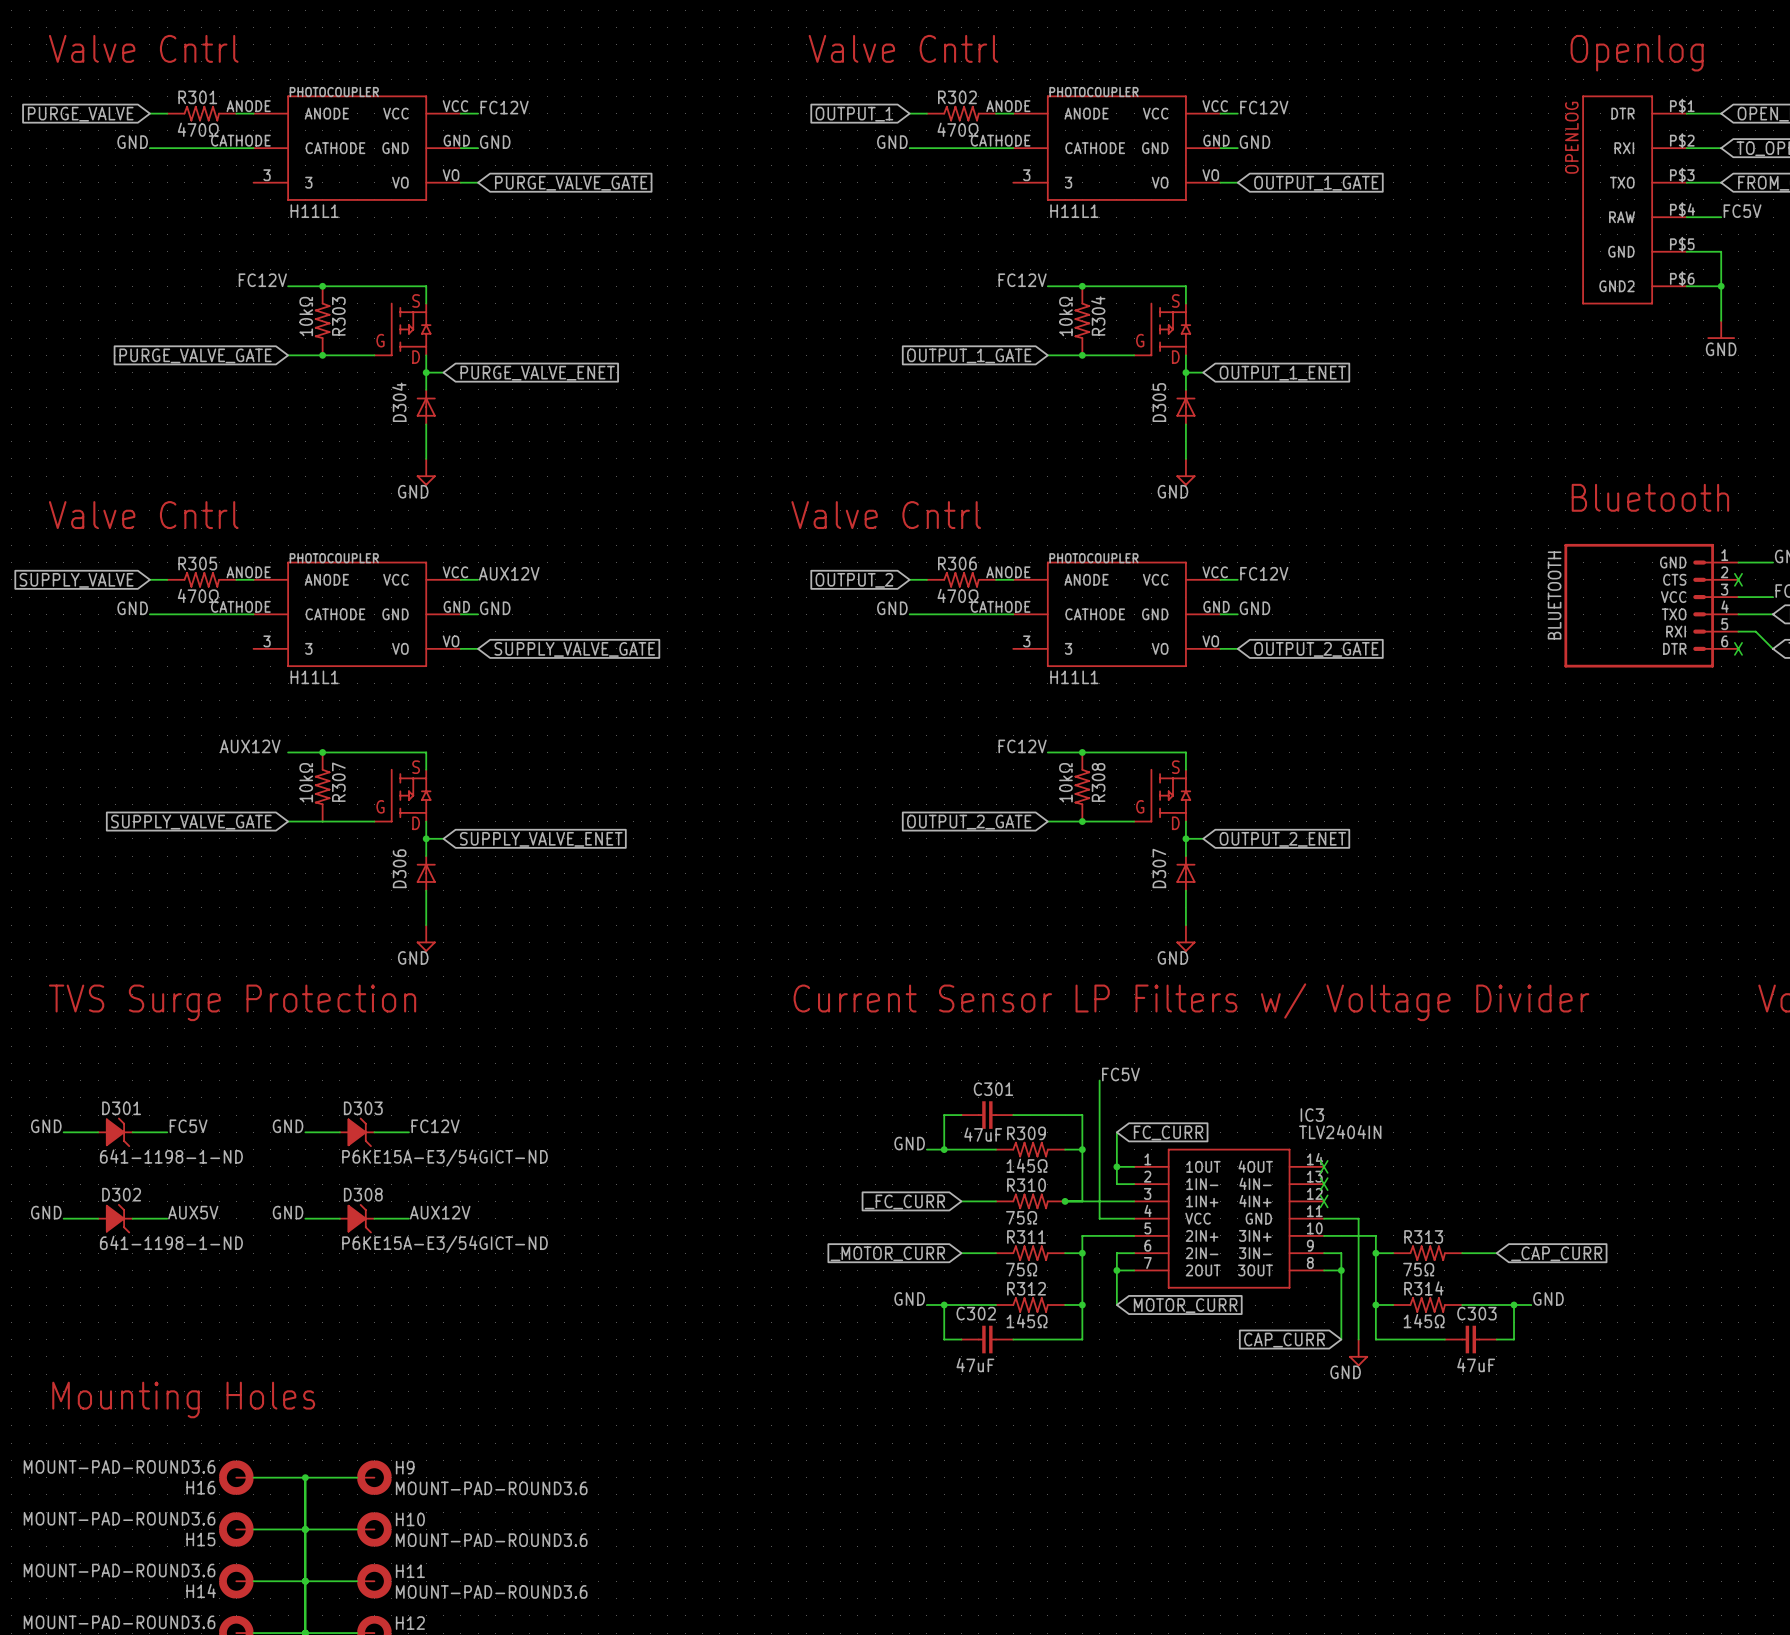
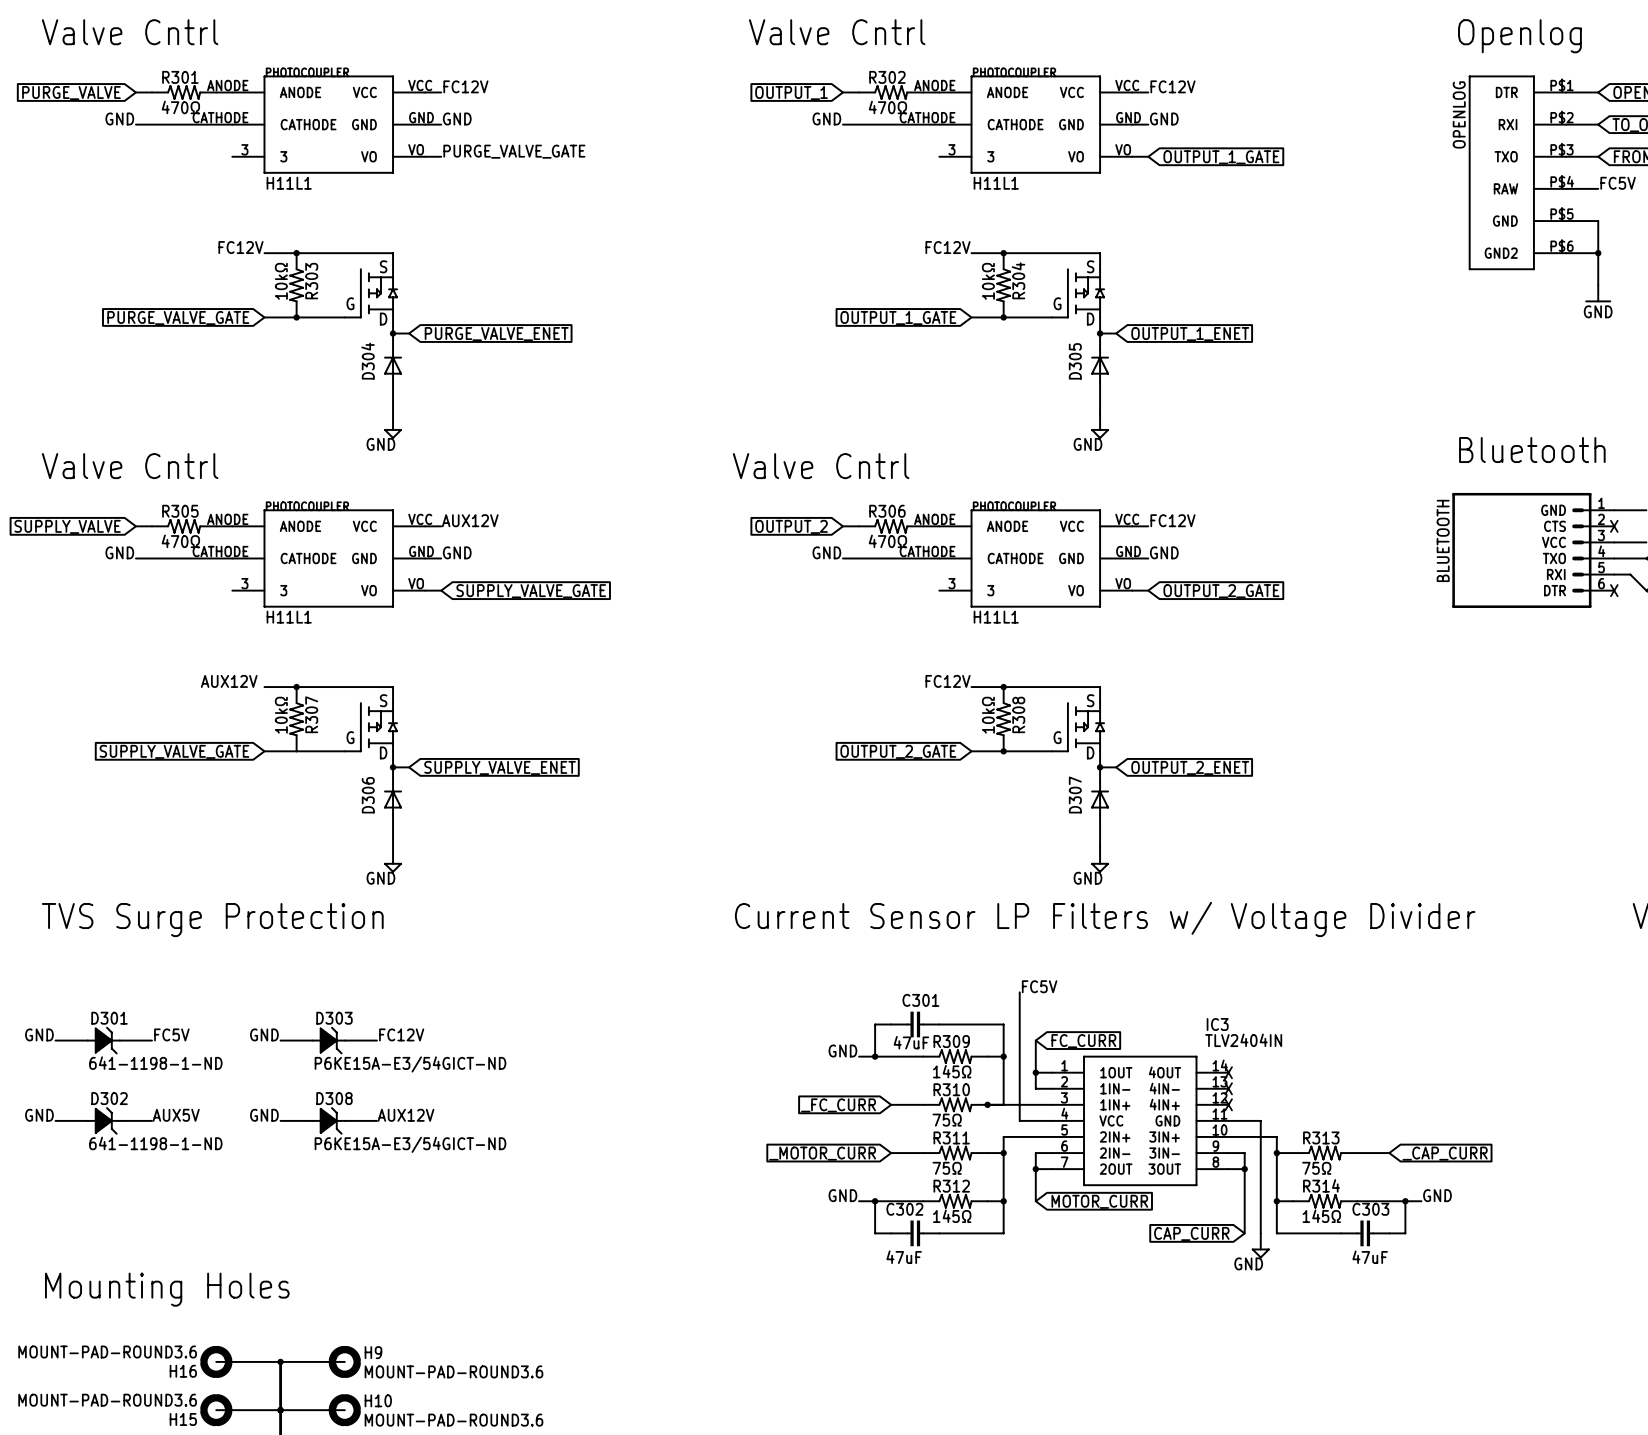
label: none -> PURGE_VALVE_GATE (514, 151)
global label: PURGE_VALVE_GATE (571, 183) -> none

